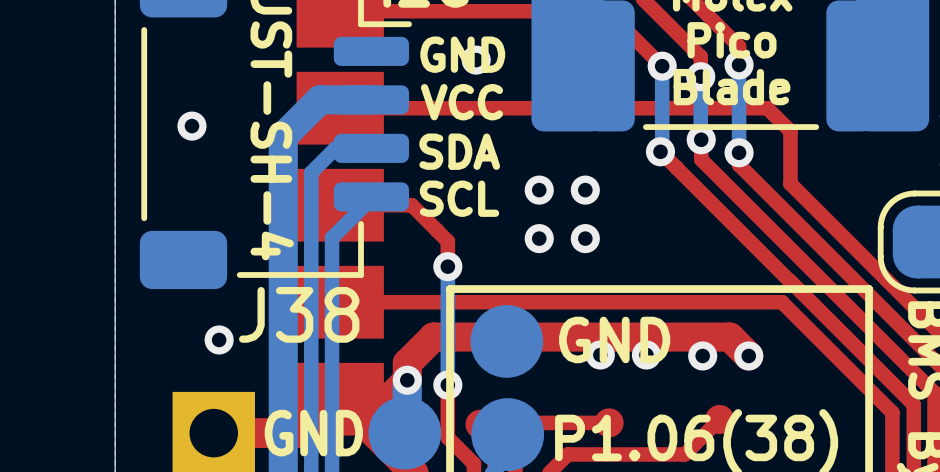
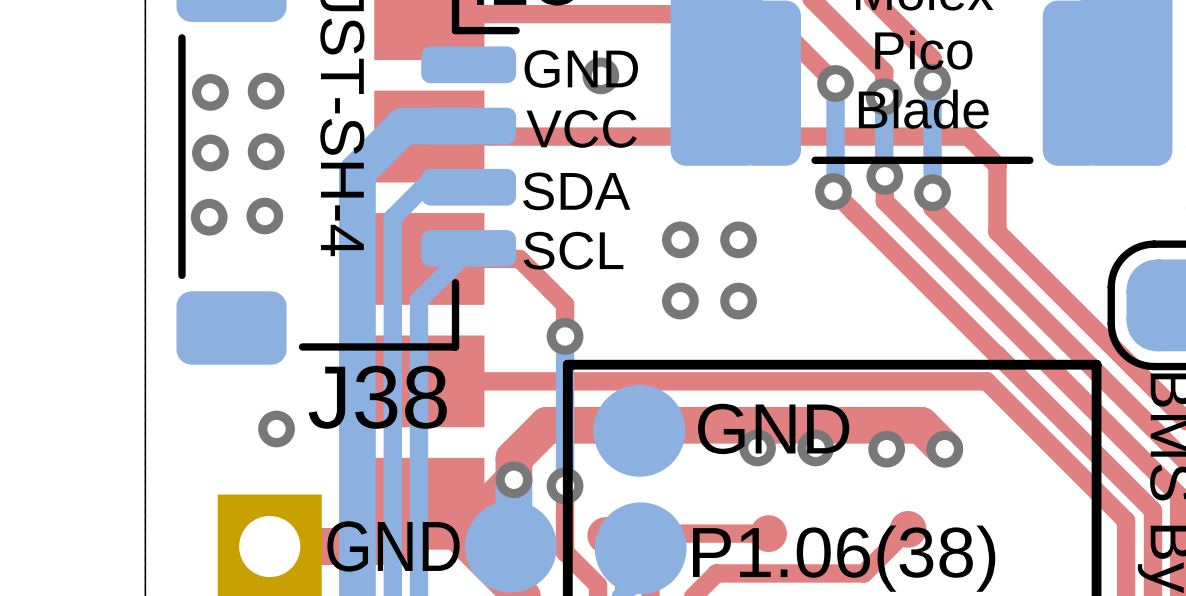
via: none -> (266, 91)
via: none -> (210, 92)
via: none -> (266, 151)
via: none -> (210, 152)
via: (191, 126) -> none
via: none -> (264, 216)
via: none -> (209, 217)

